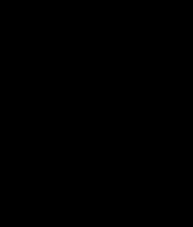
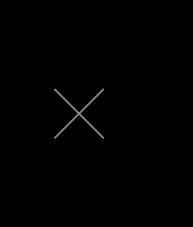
no-connect mark: none -> (79, 113)

